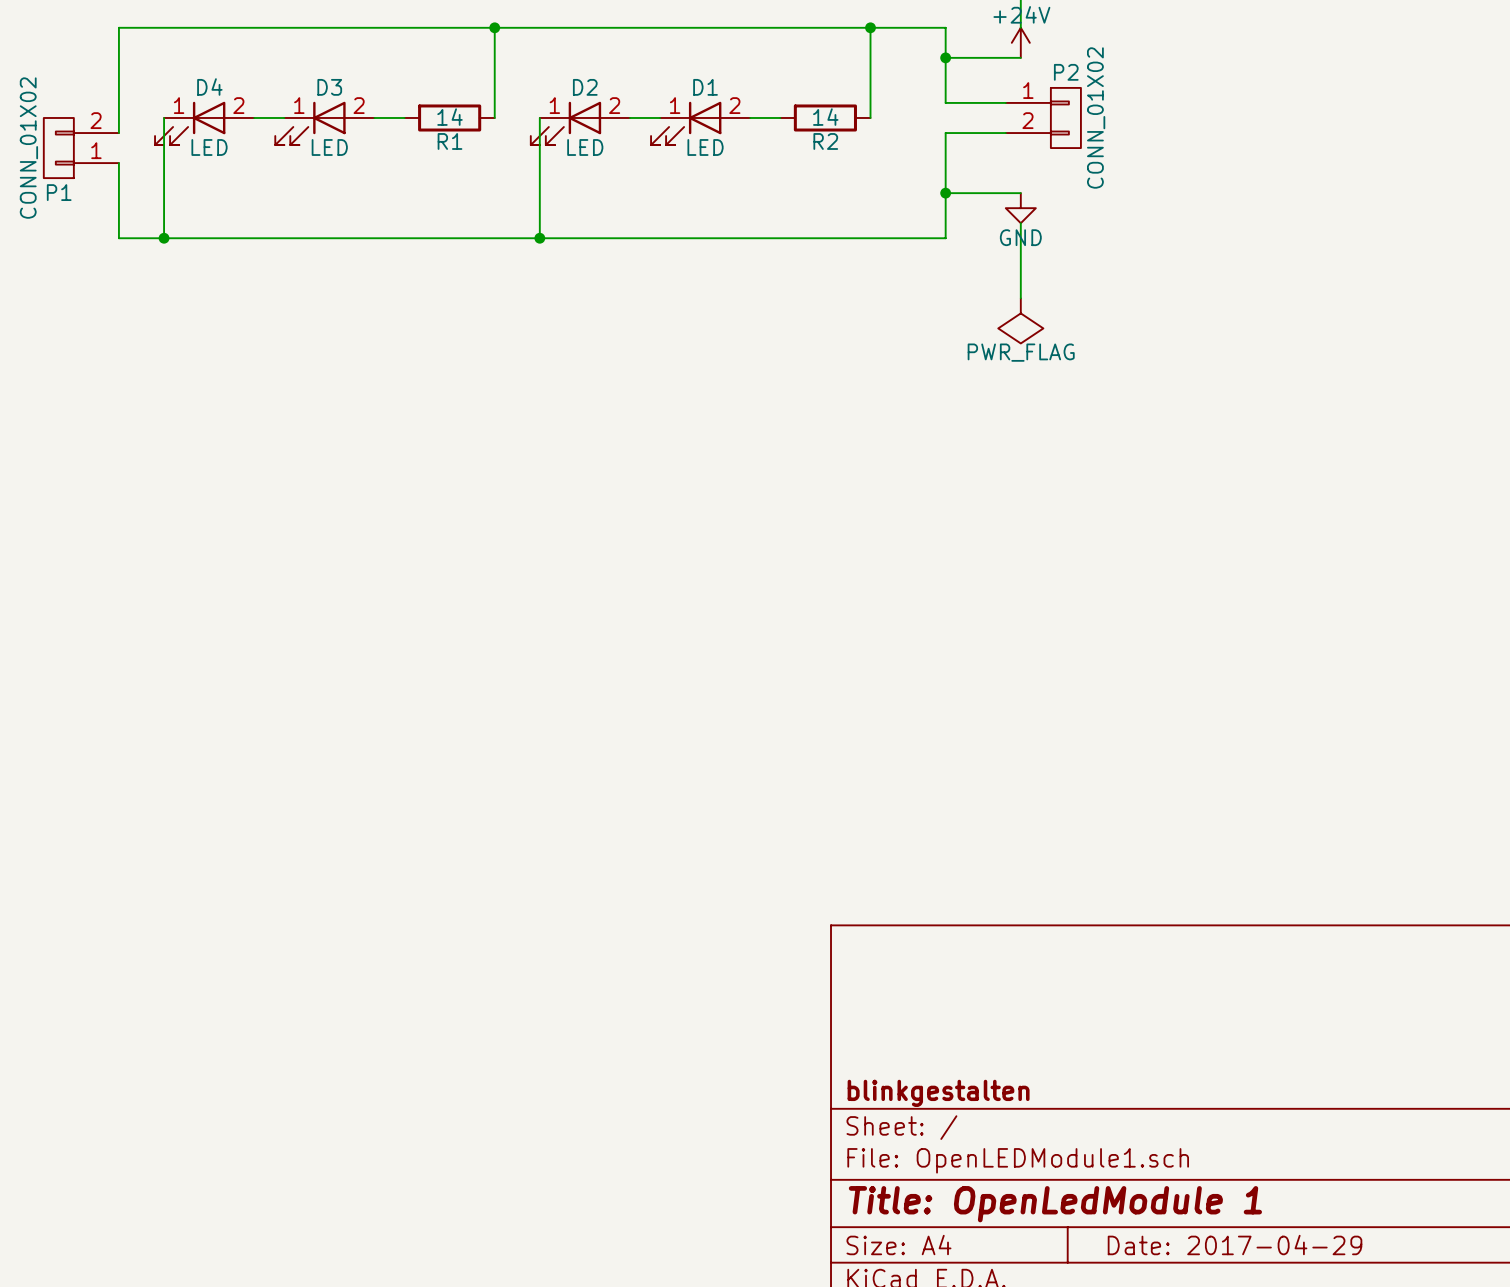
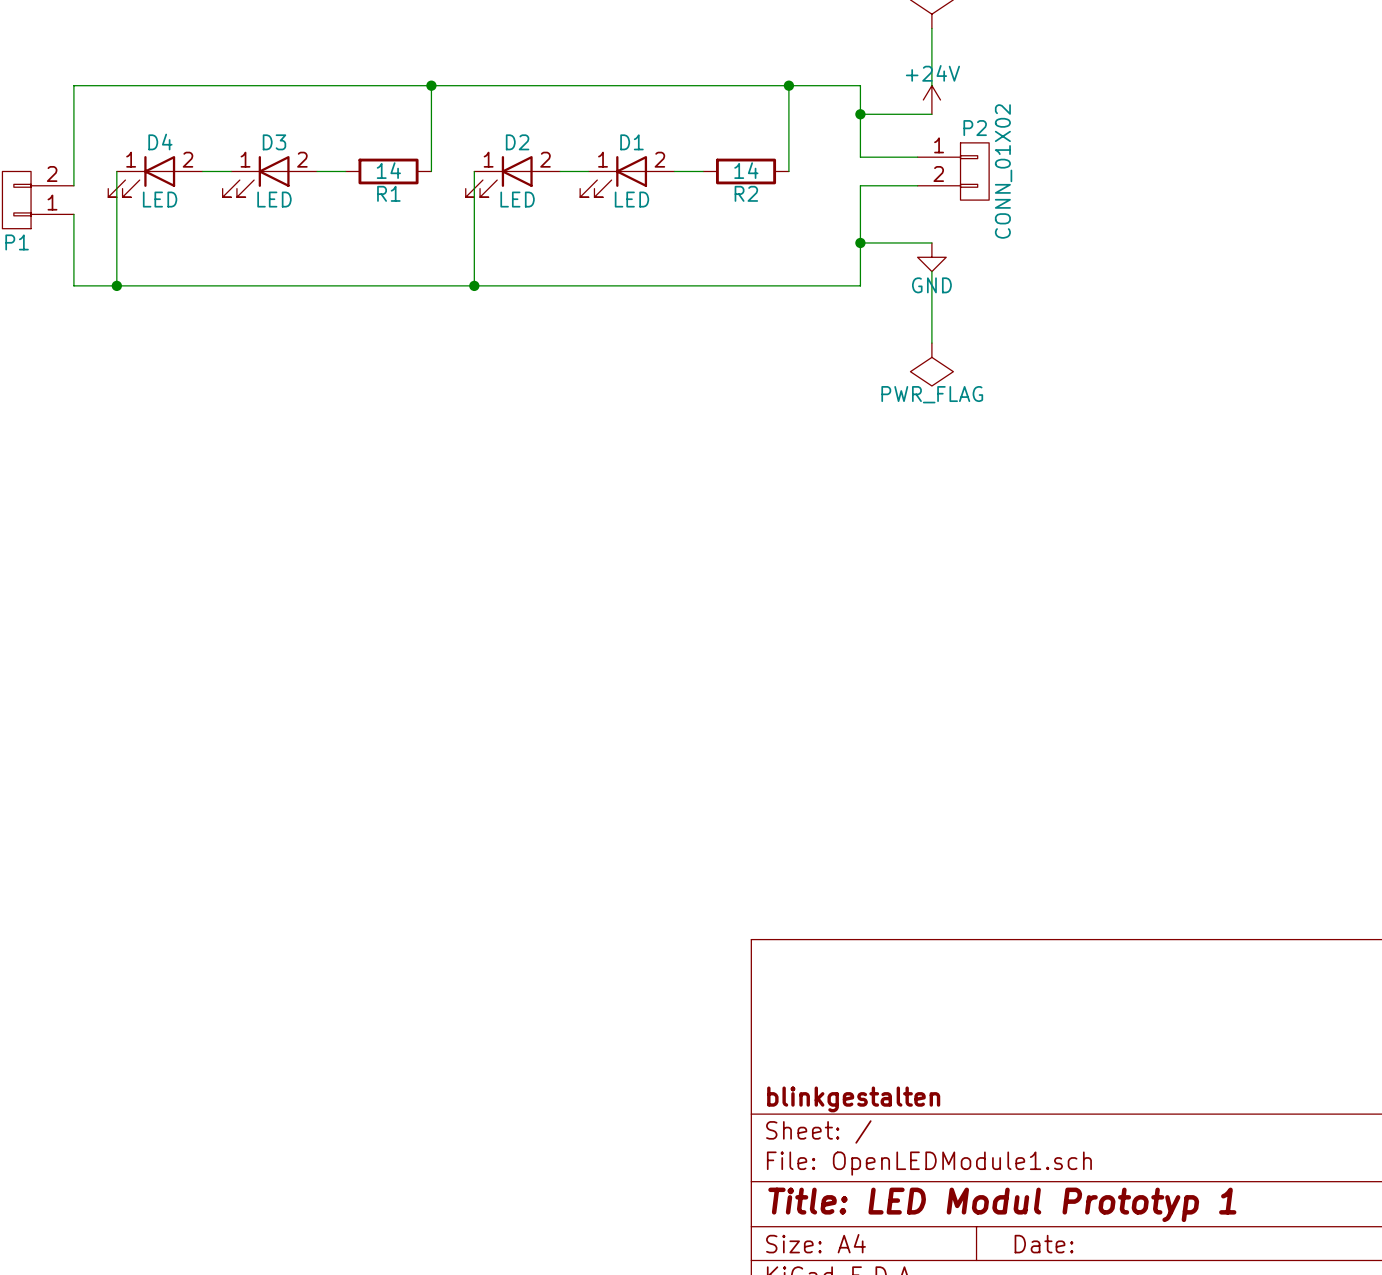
title block: Title: OpenLedModule 1 (1055, 1204) -> Title: LED Modul Prototyp 1 (1002, 1204)
title block: Date: 2017-04-29 (1235, 1245) -> Date: (1044, 1244)

